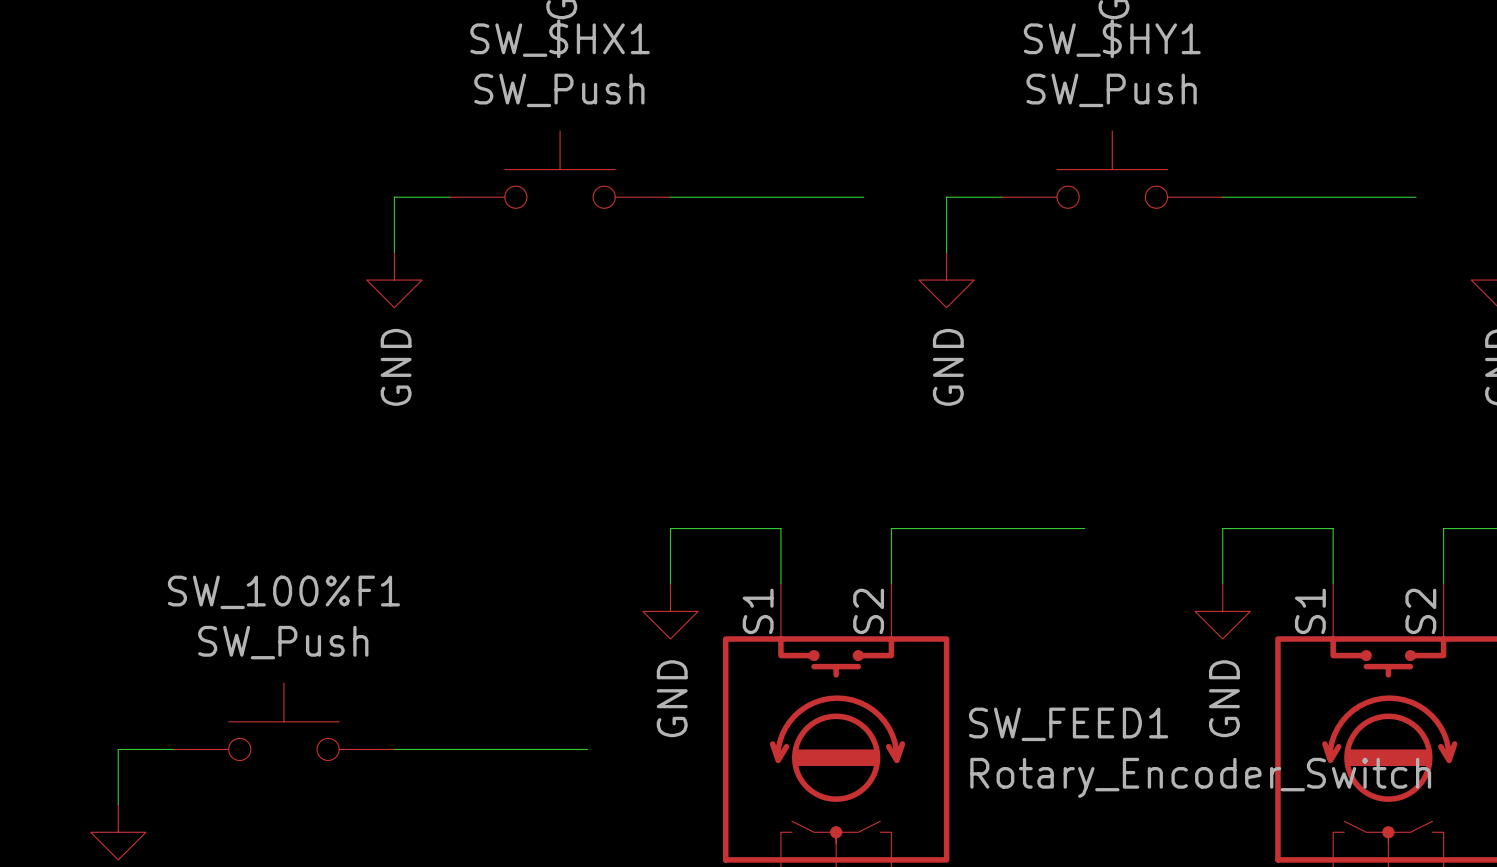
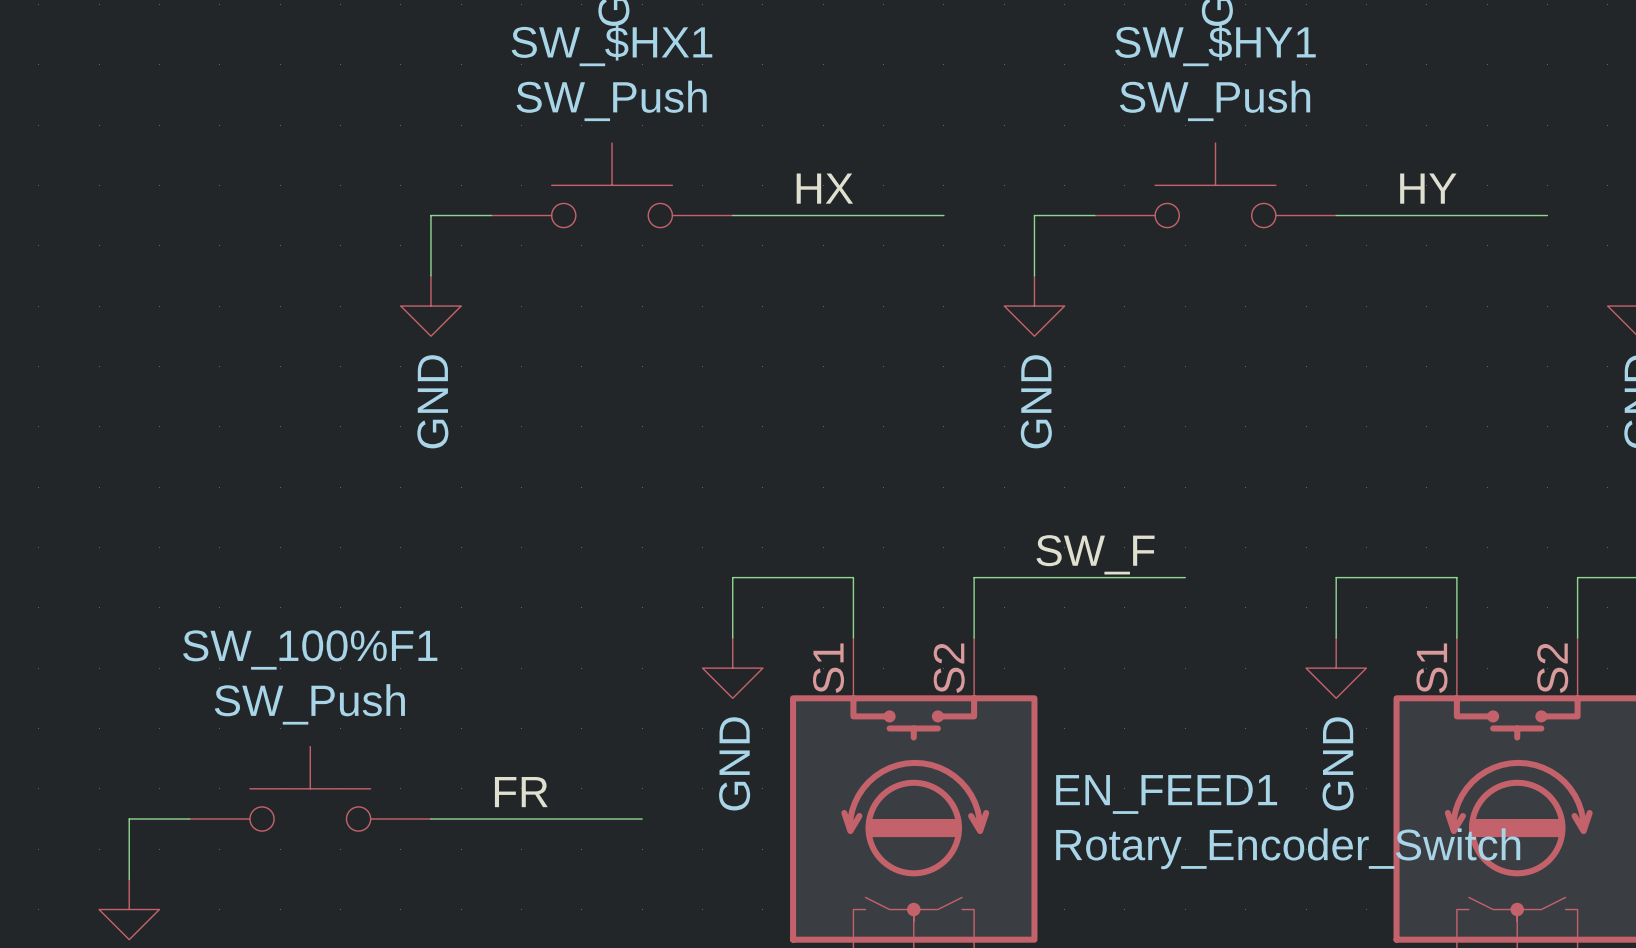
label: none -> HX (824, 188)
label: none -> HY (1428, 188)
label: none -> SW_F (1095, 554)
label: none -> FR (521, 792)
SW_FEED1 name: SW_FEED1 (1068, 724) -> EN_FEED1 (1166, 794)

